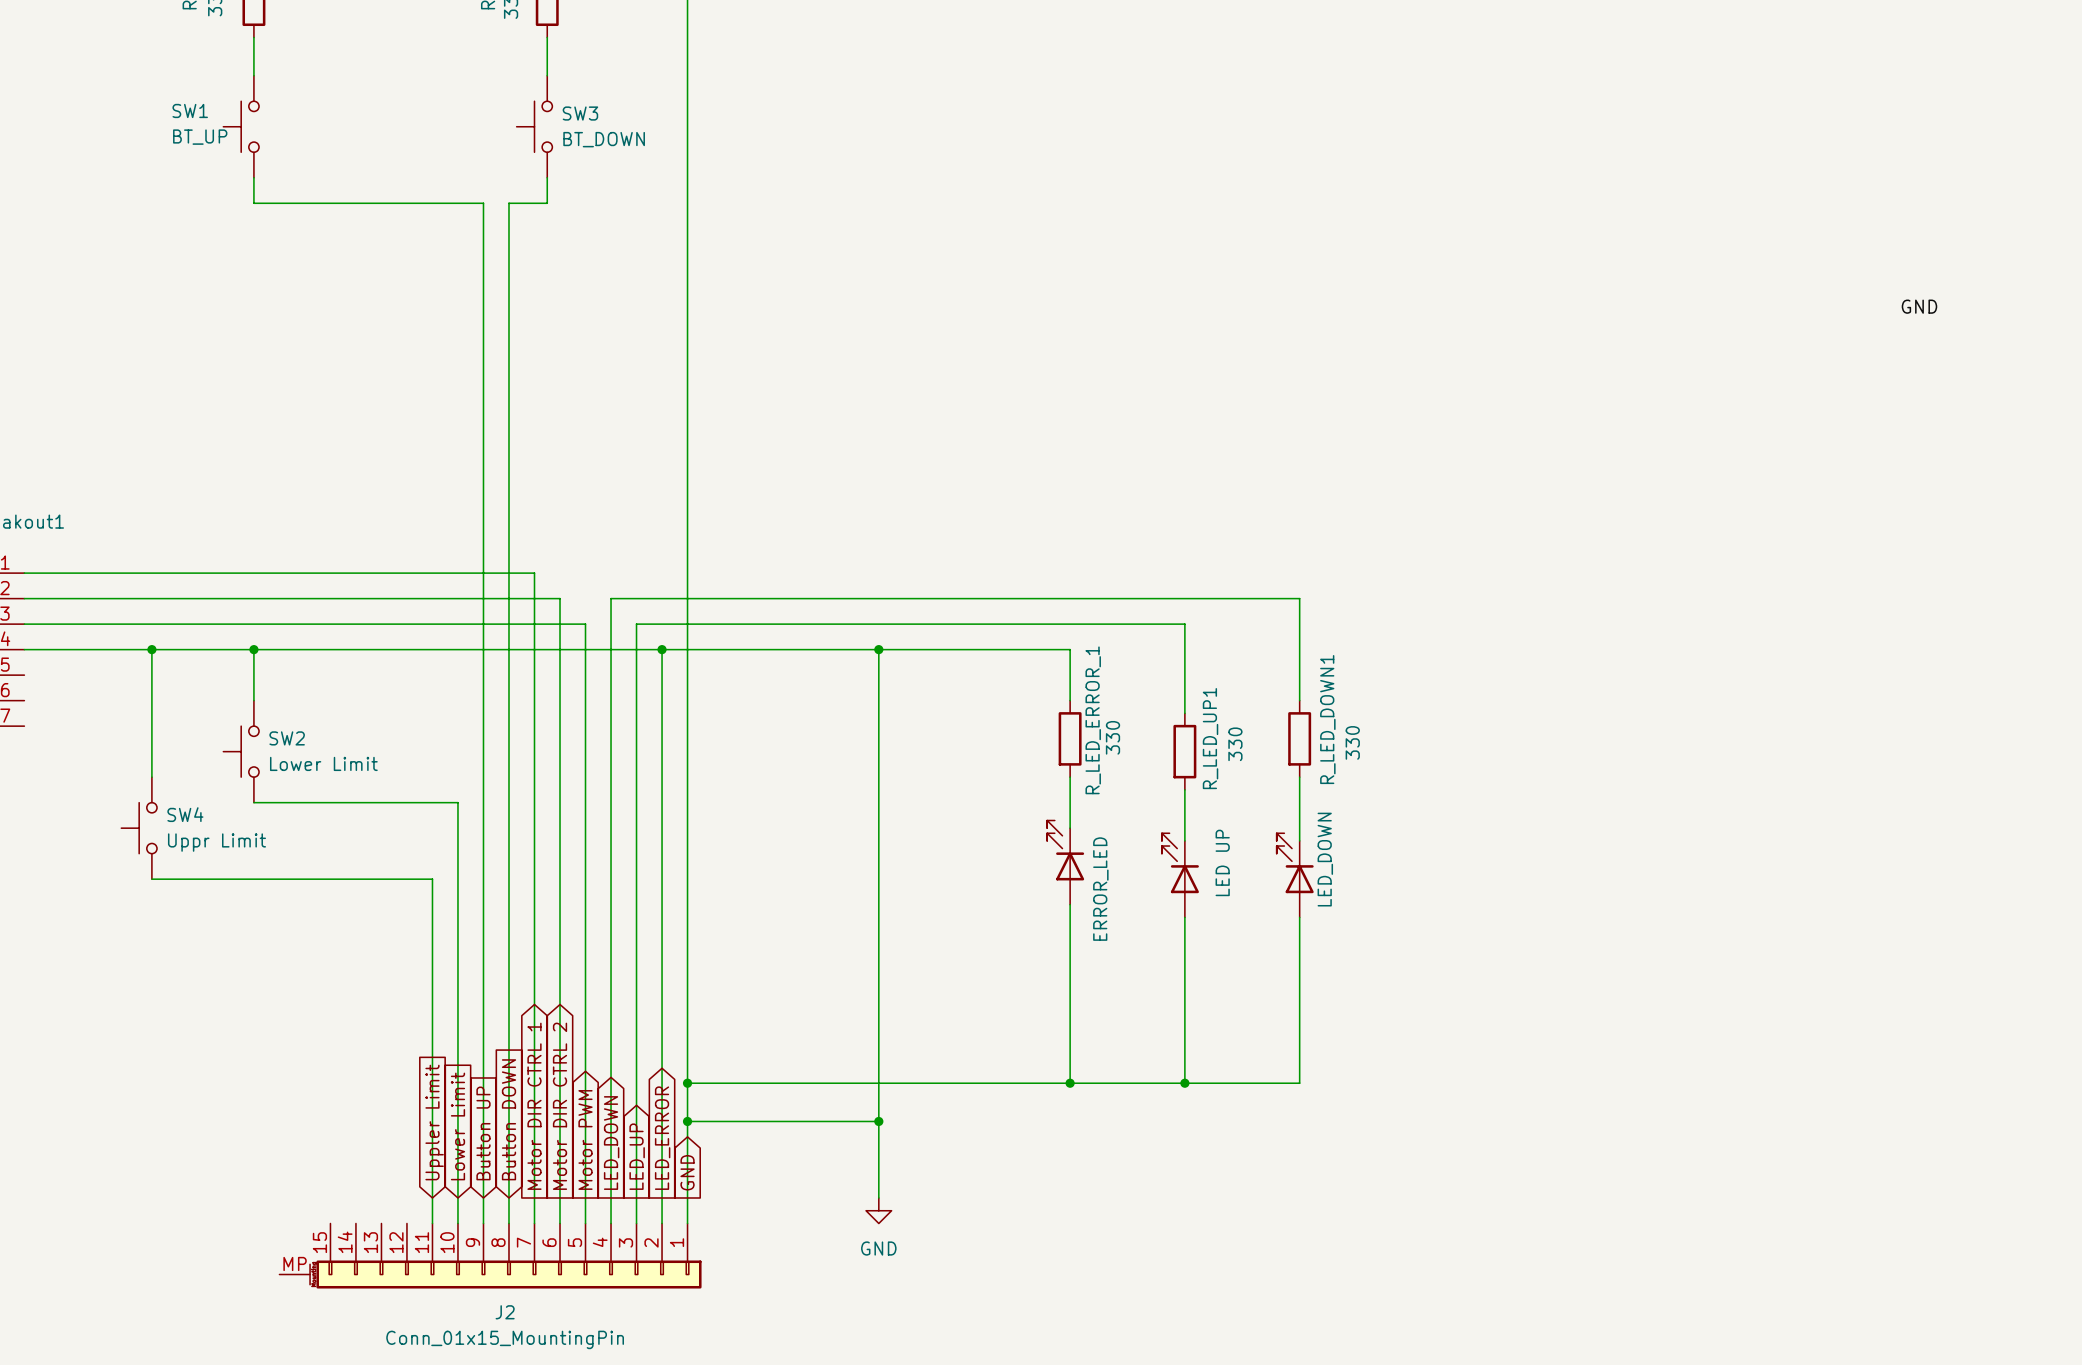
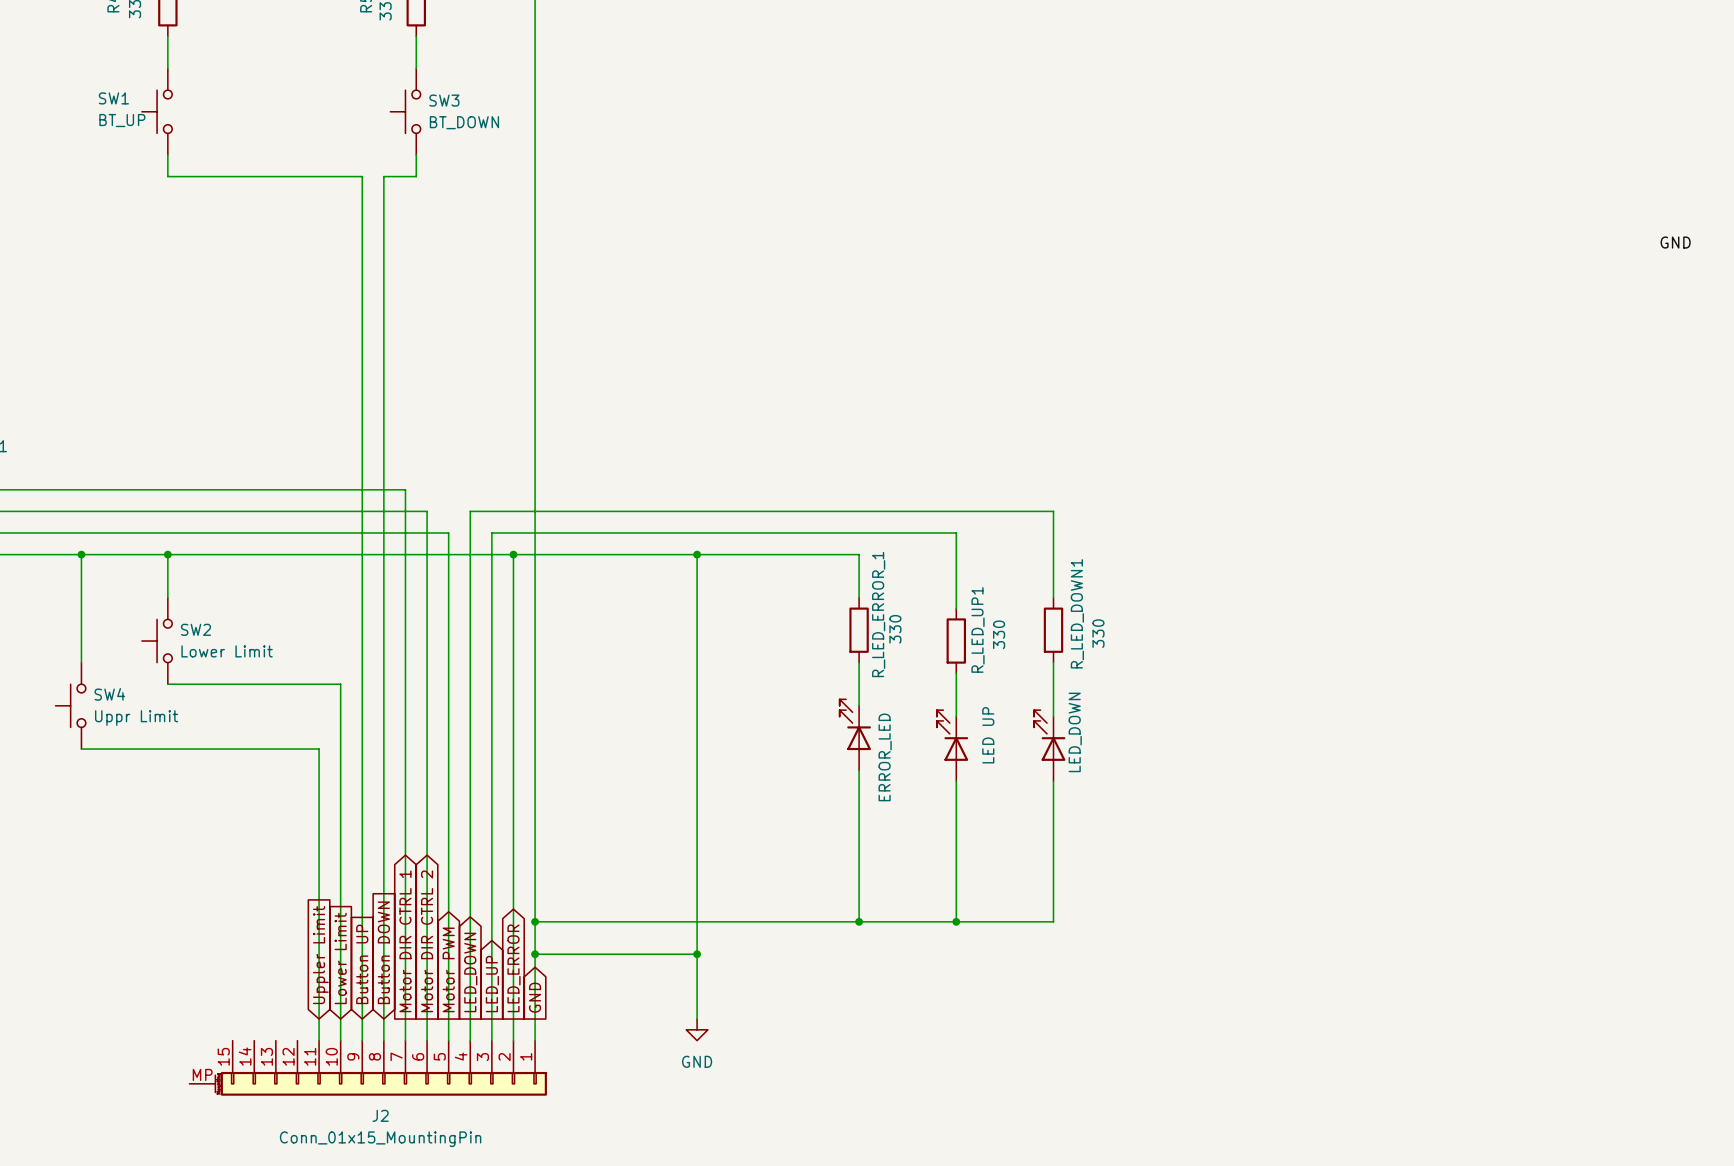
label position: GND (1919, 306) -> GND (1675, 242)

